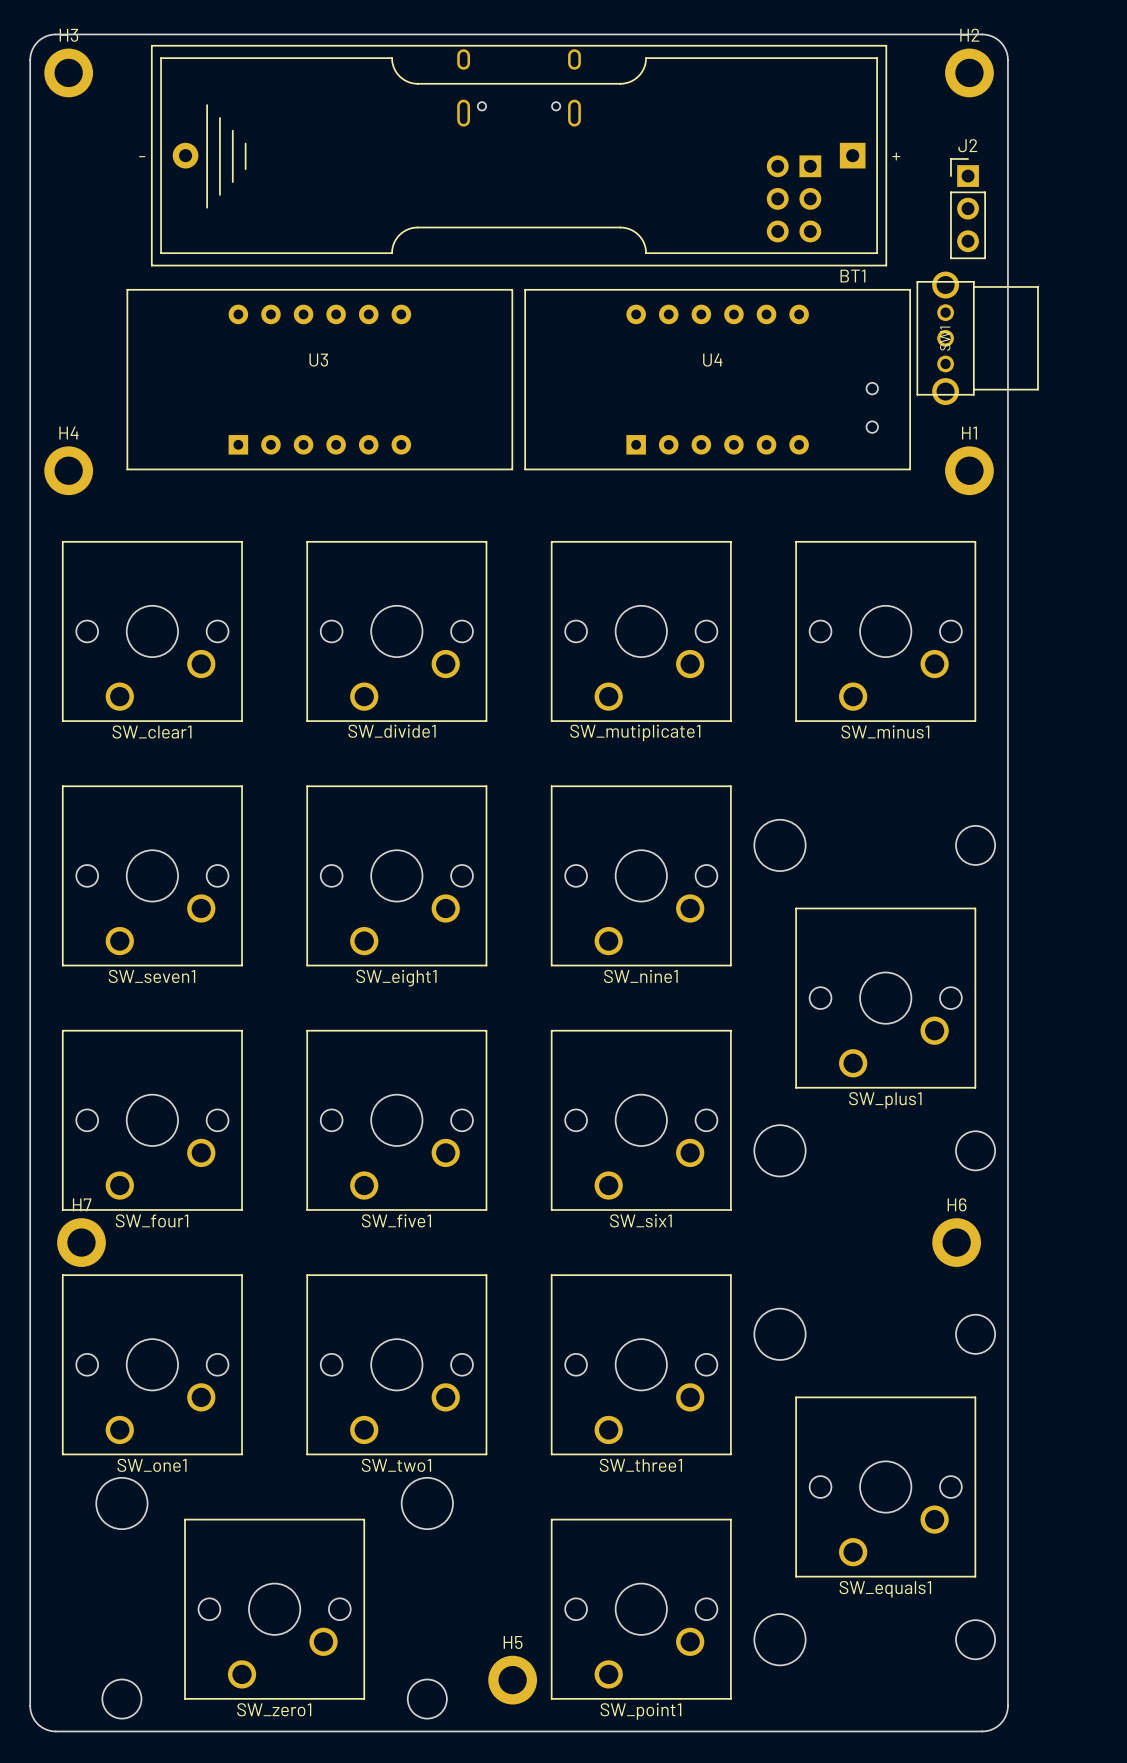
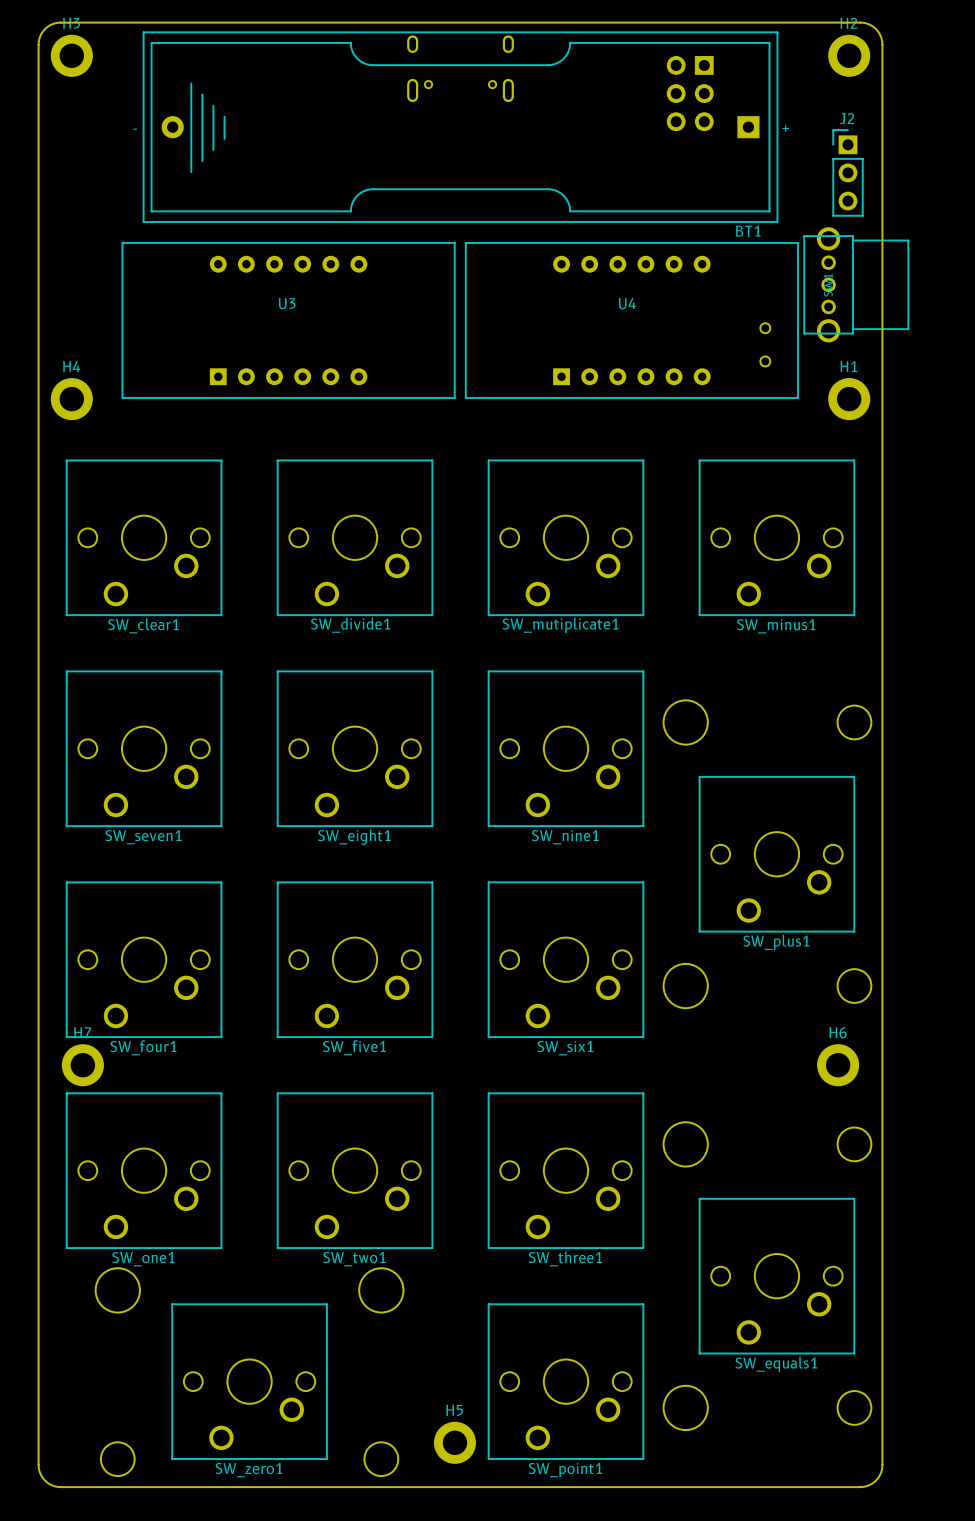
part position: (794, 198) -> (690, 93)

